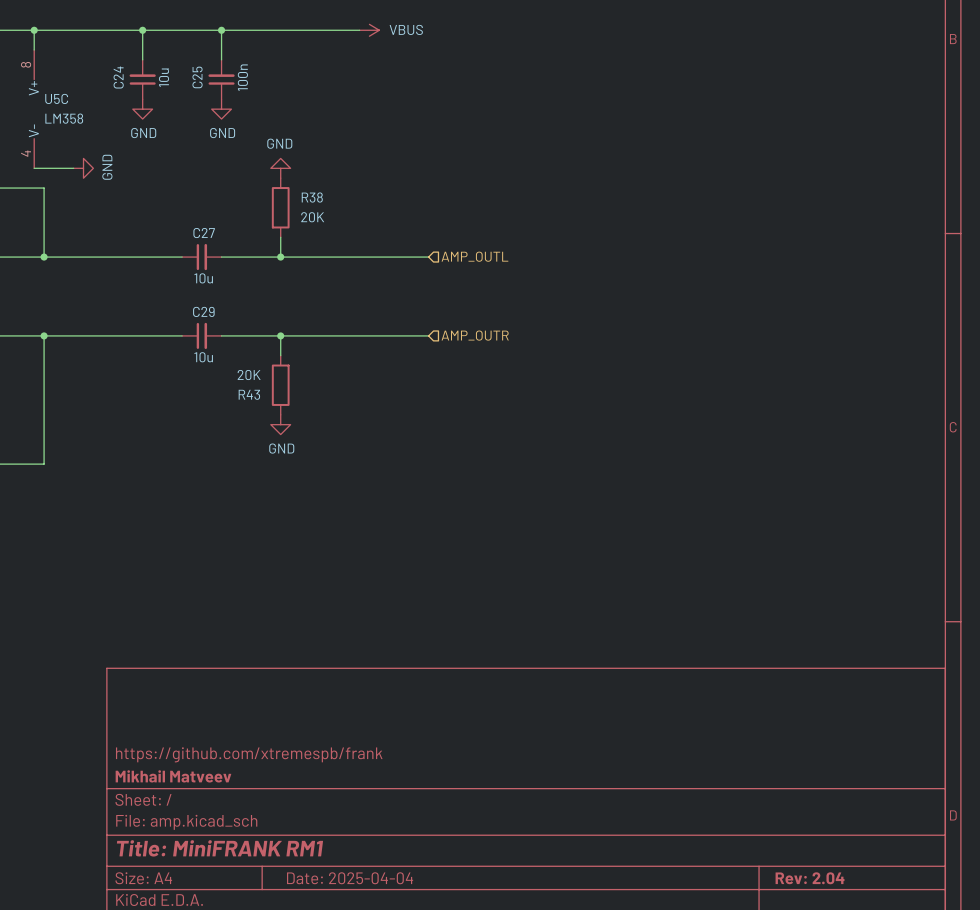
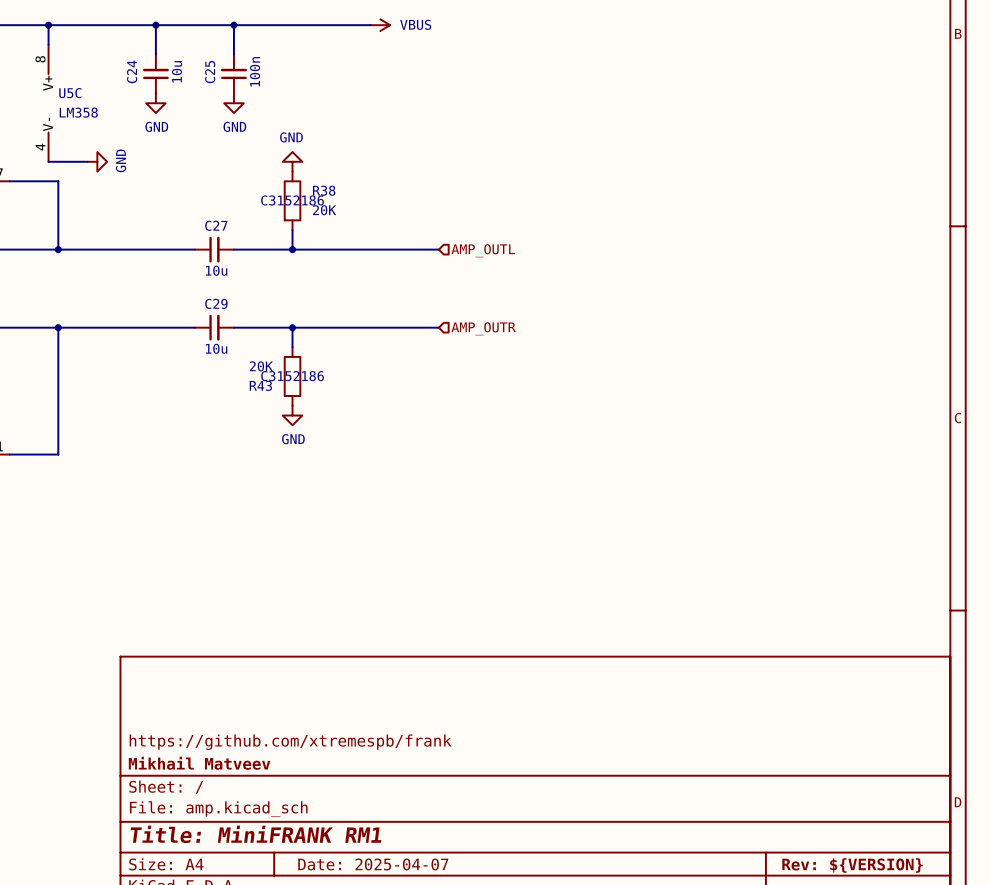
R38 text: none -> C3152186 (292, 200)
R43 text: none -> C3152186 (292, 376)
title block: Date: 2025-04-04 (350, 878) -> Date: 2025-04-07 (373, 864)
title block: Rev: 2.04 (810, 878) -> Rev: ${VERSION} (852, 865)

